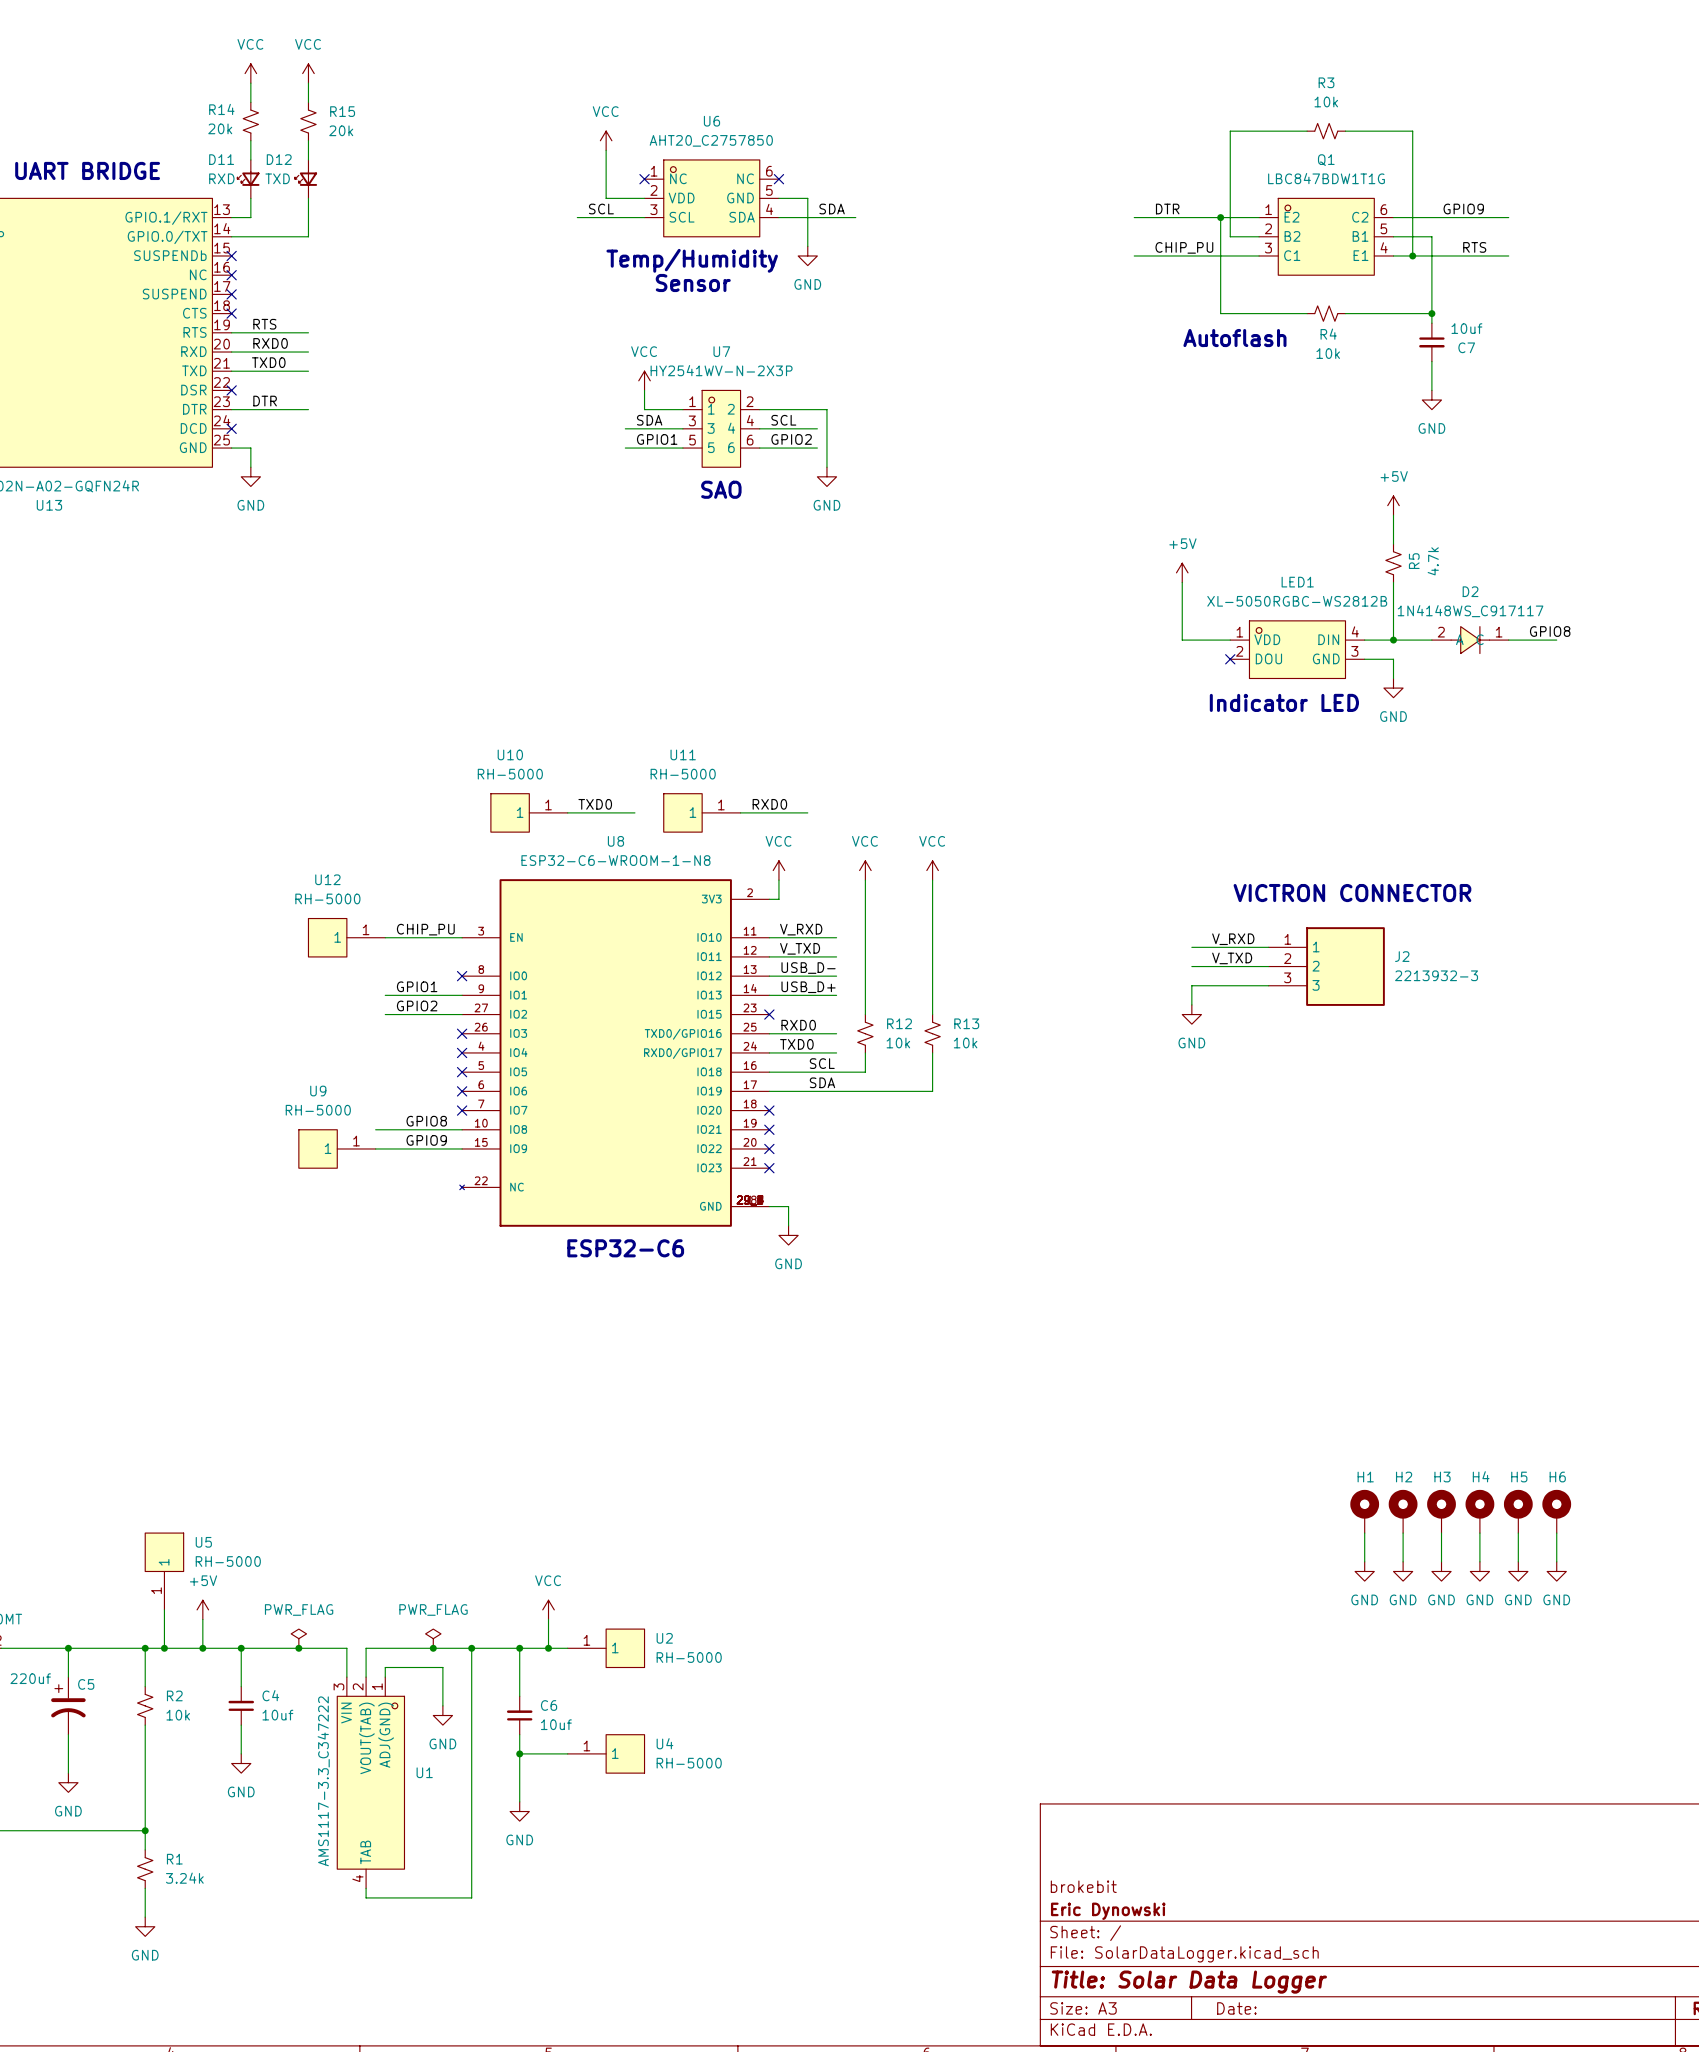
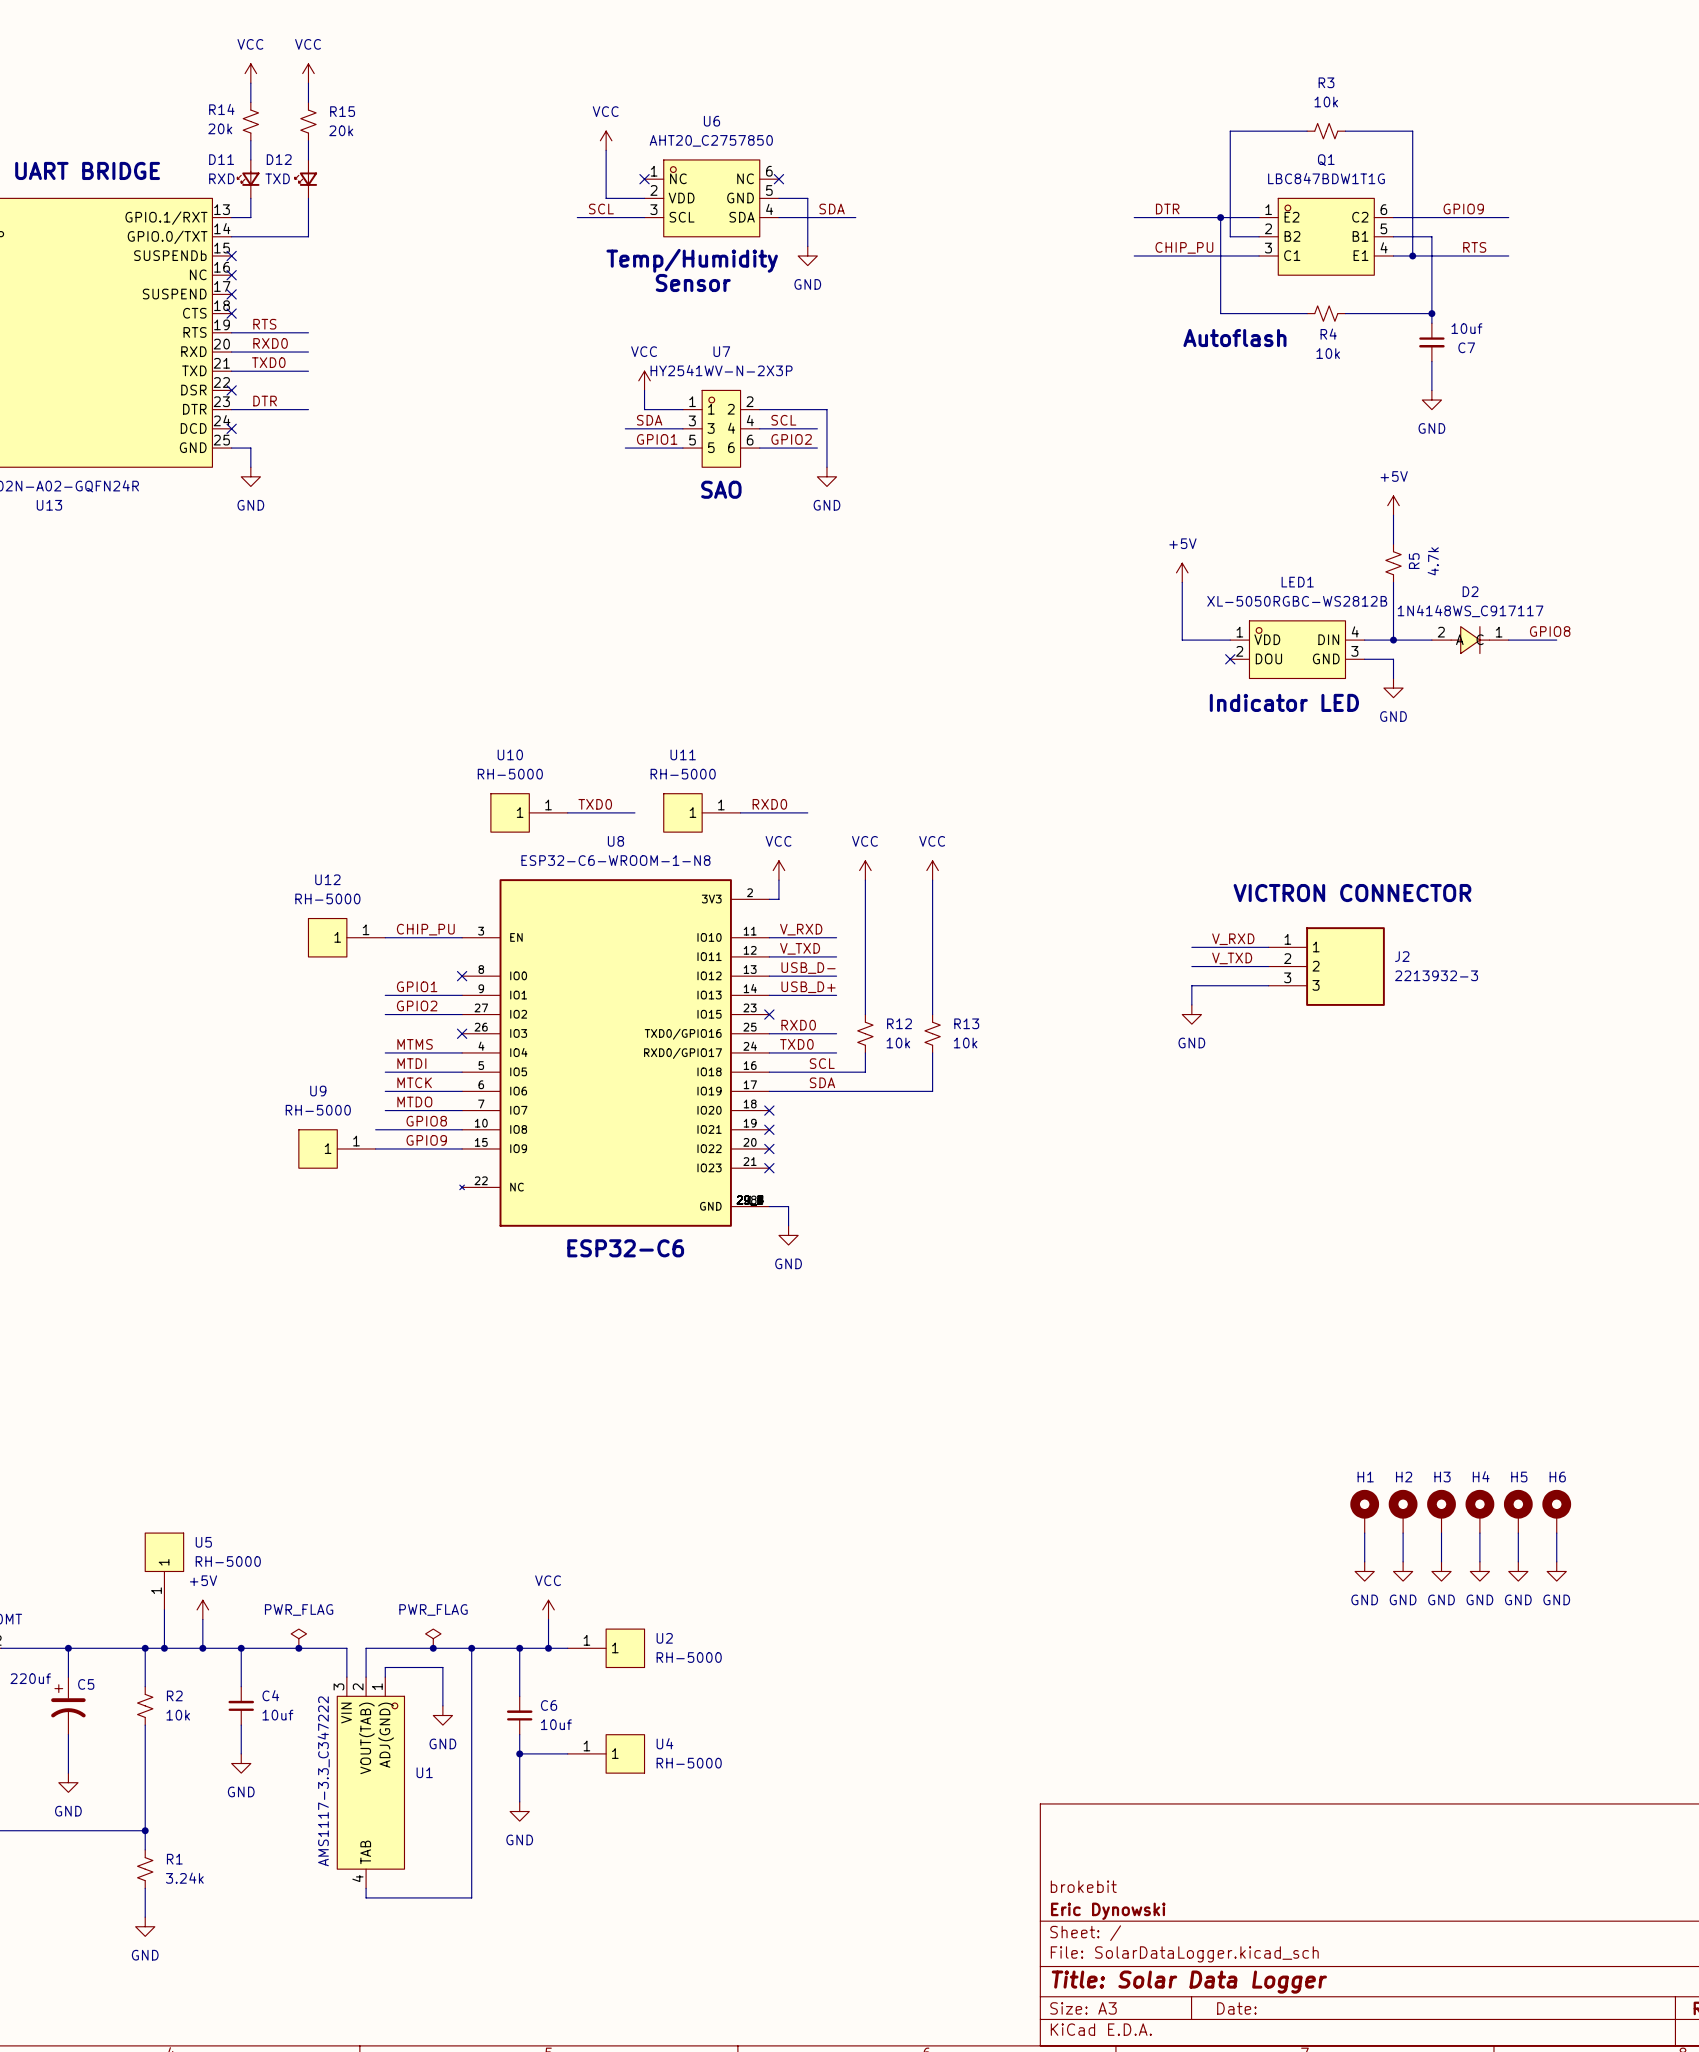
label: none -> MTMS (415, 1044)
wire: none -> (385, 1052) (462, 1052)
no-connect mark: (462, 1052) -> none
label: none -> MTDI (411, 1063)
wire: none -> (385, 1072) (462, 1072)
no-connect mark: (462, 1072) -> none
label: none -> MTCK (414, 1082)
wire: none -> (385, 1091) (462, 1091)
no-connect mark: (462, 1091) -> none
label: none -> MTDO (414, 1102)
wire: none -> (385, 1110) (462, 1110)
no-connect mark: (462, 1110) -> none

